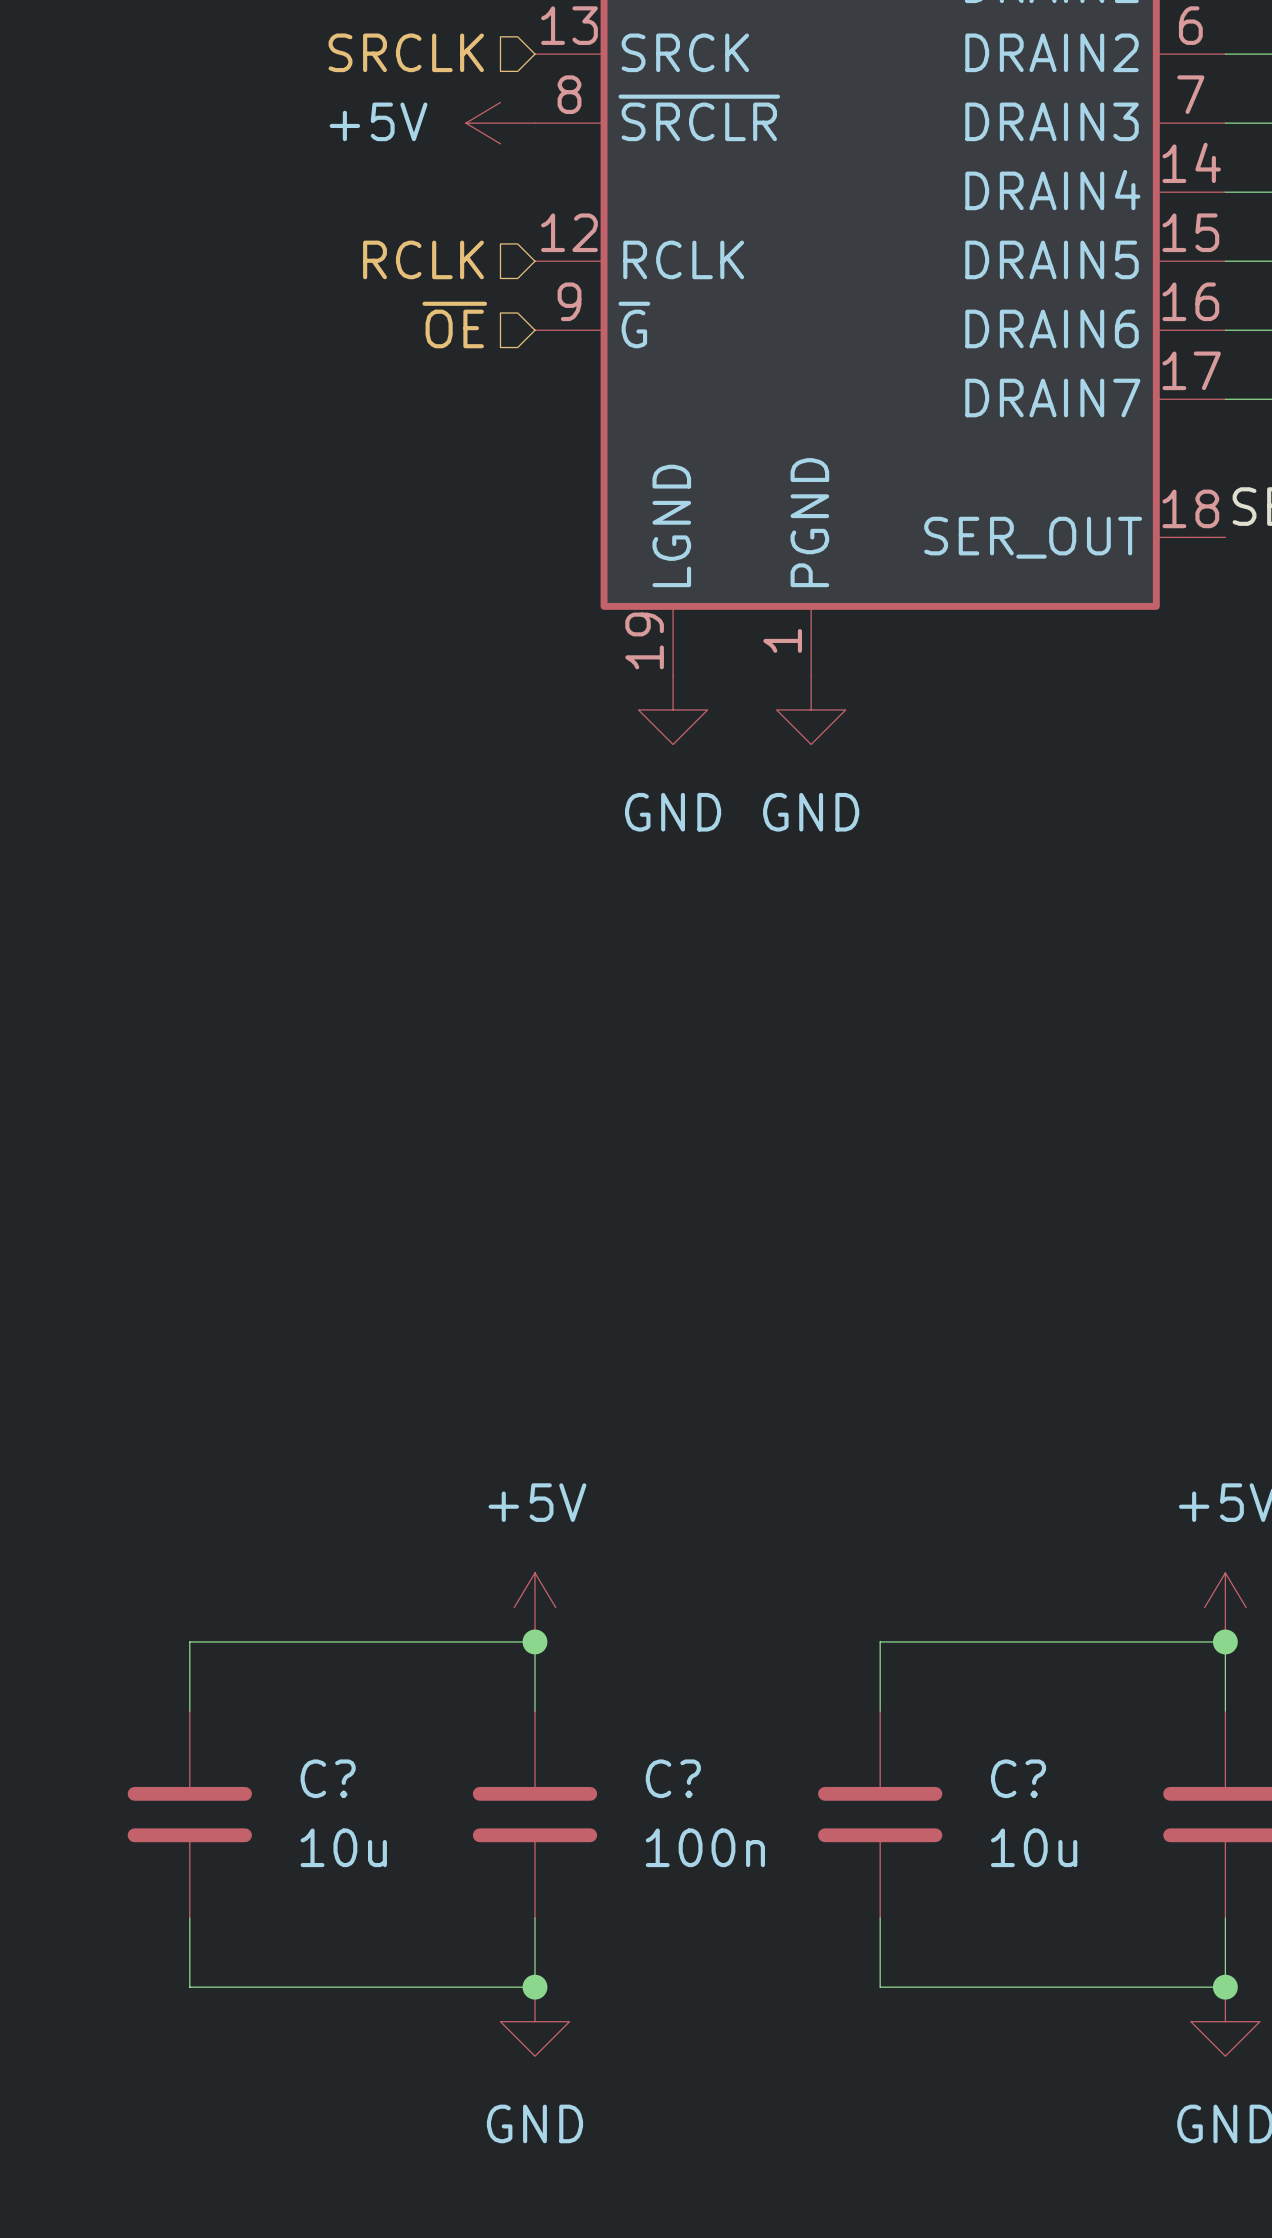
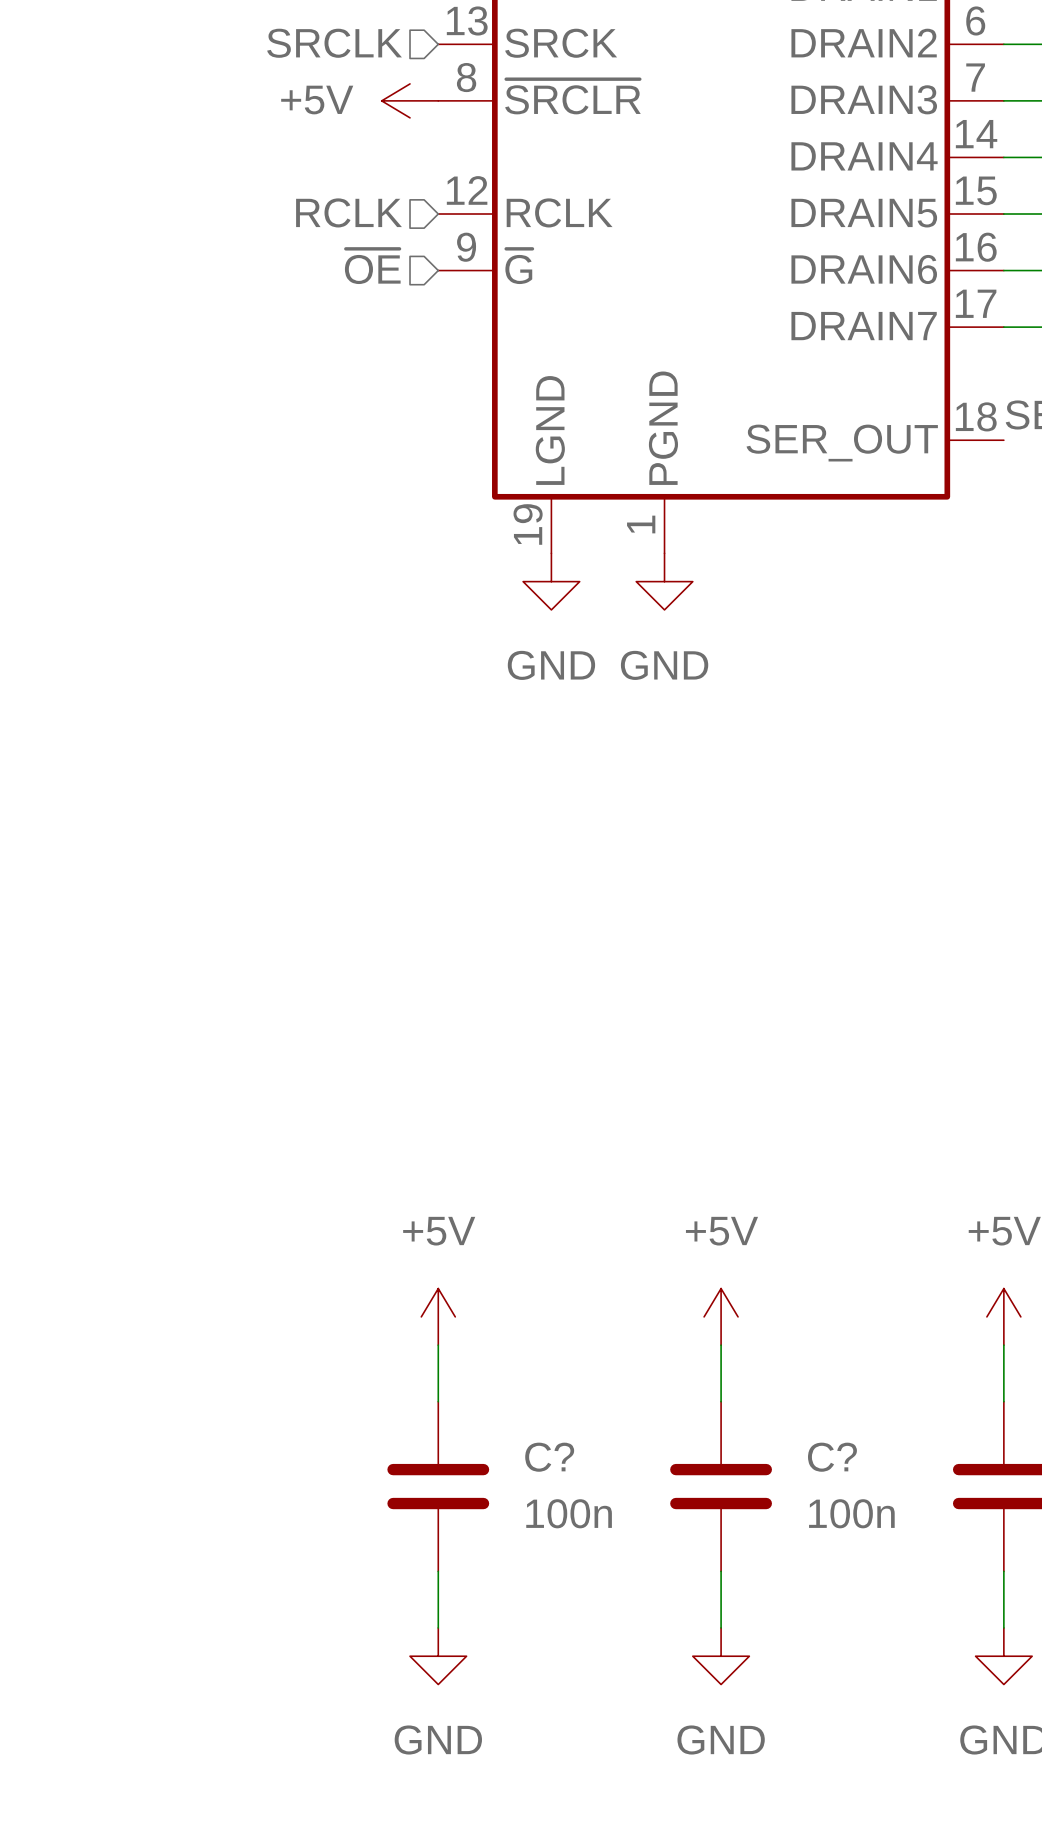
power symbol: none -> +5V (721, 1316)
wire: (534, 1641) (189, 1641) (189, 1711) -> none
junction: (534, 1641) -> none
wire: (880, 1641) (1225, 1641) -> none
junction: (1225, 1641) -> none
C?: 10u (189, 1814) -> none
C? value: 10u (1034, 1847) -> 100n (851, 1513)
wire: (189, 1918) (189, 1987) (534, 1987) -> none
junction: (534, 1987) -> none
wire: (880, 1987) (1225, 1987) -> none
junction: (1225, 1987) -> none
power symbol: none -> GND (721, 1656)

